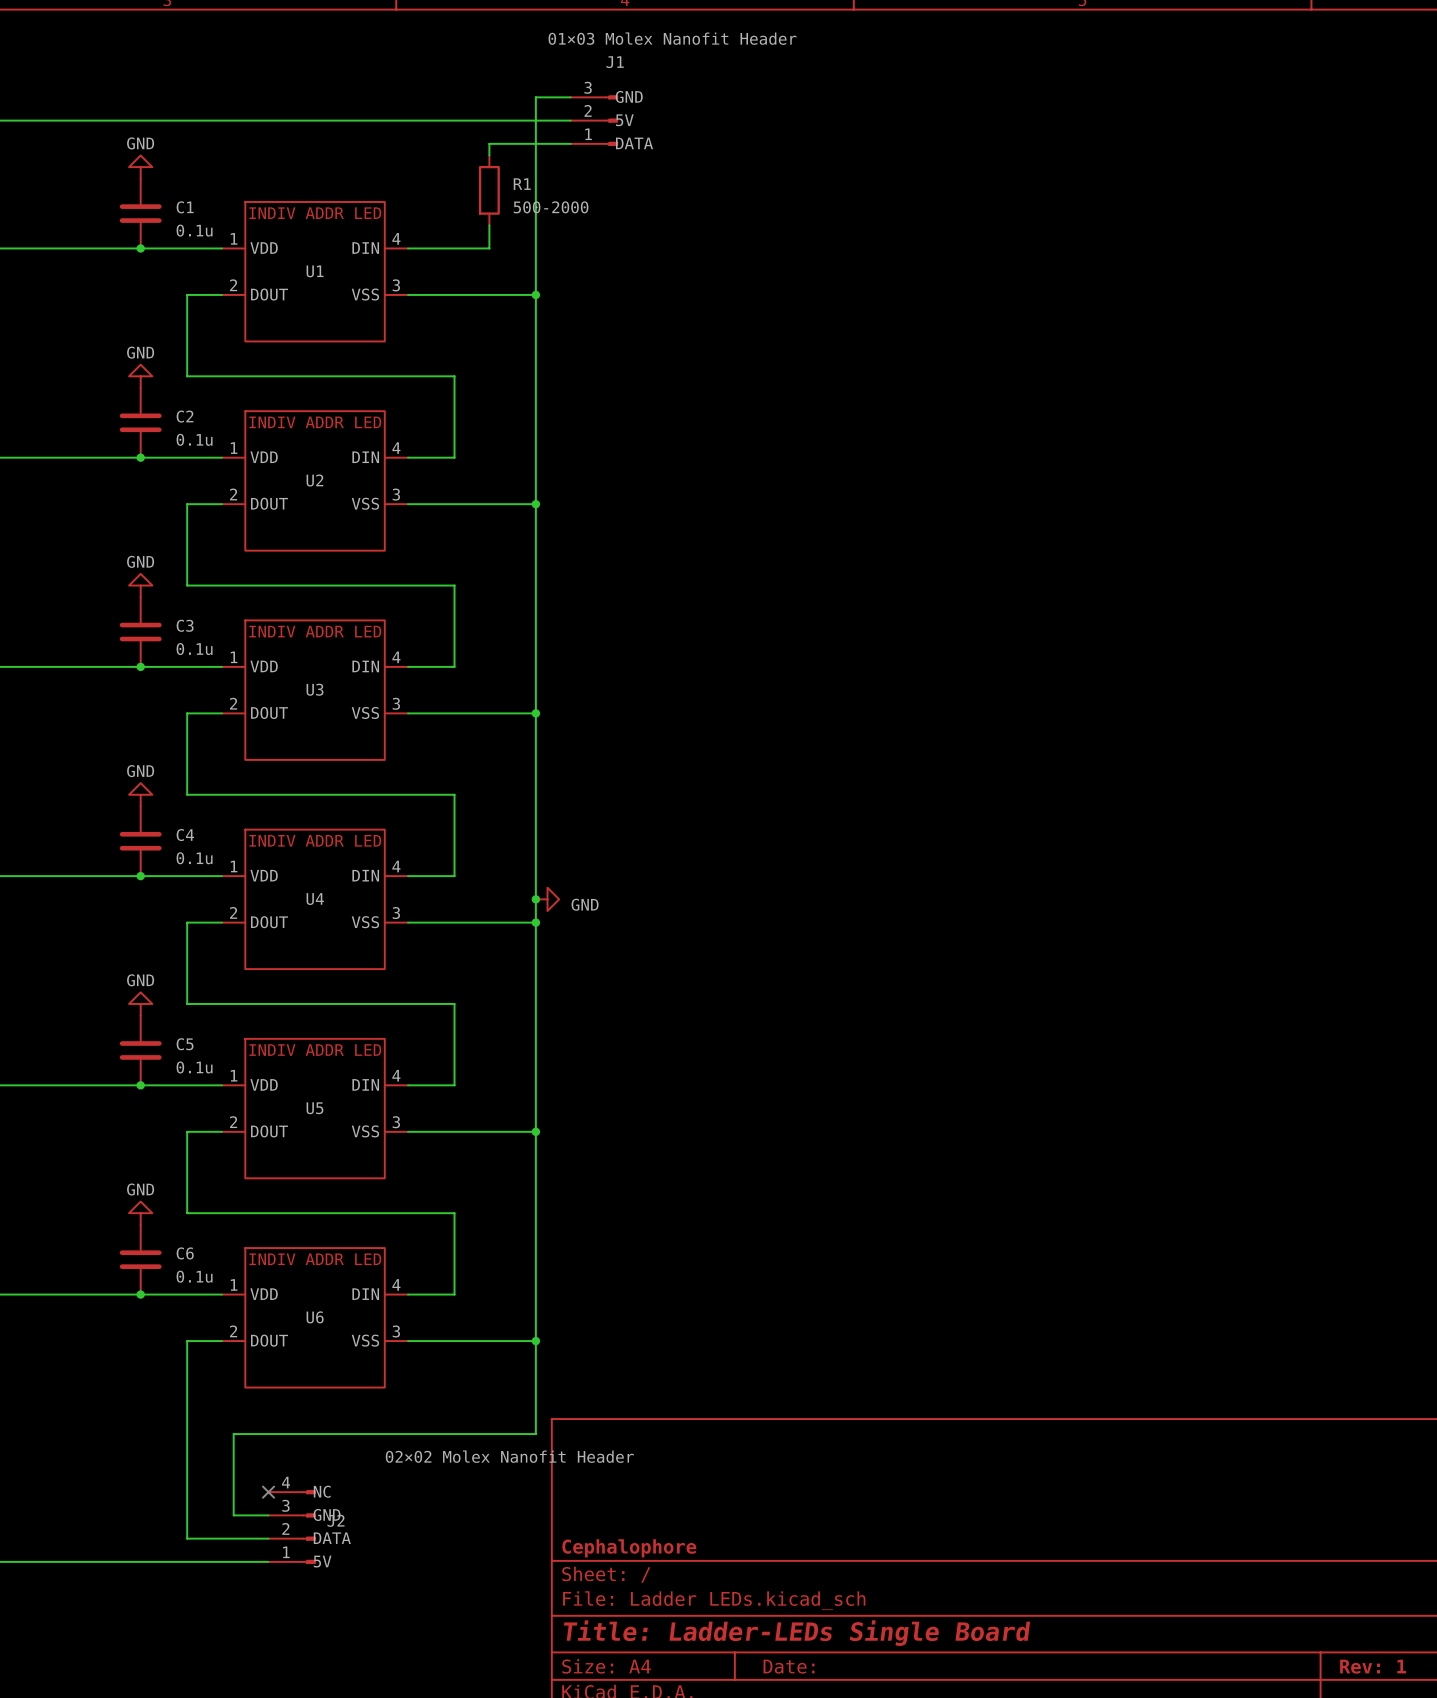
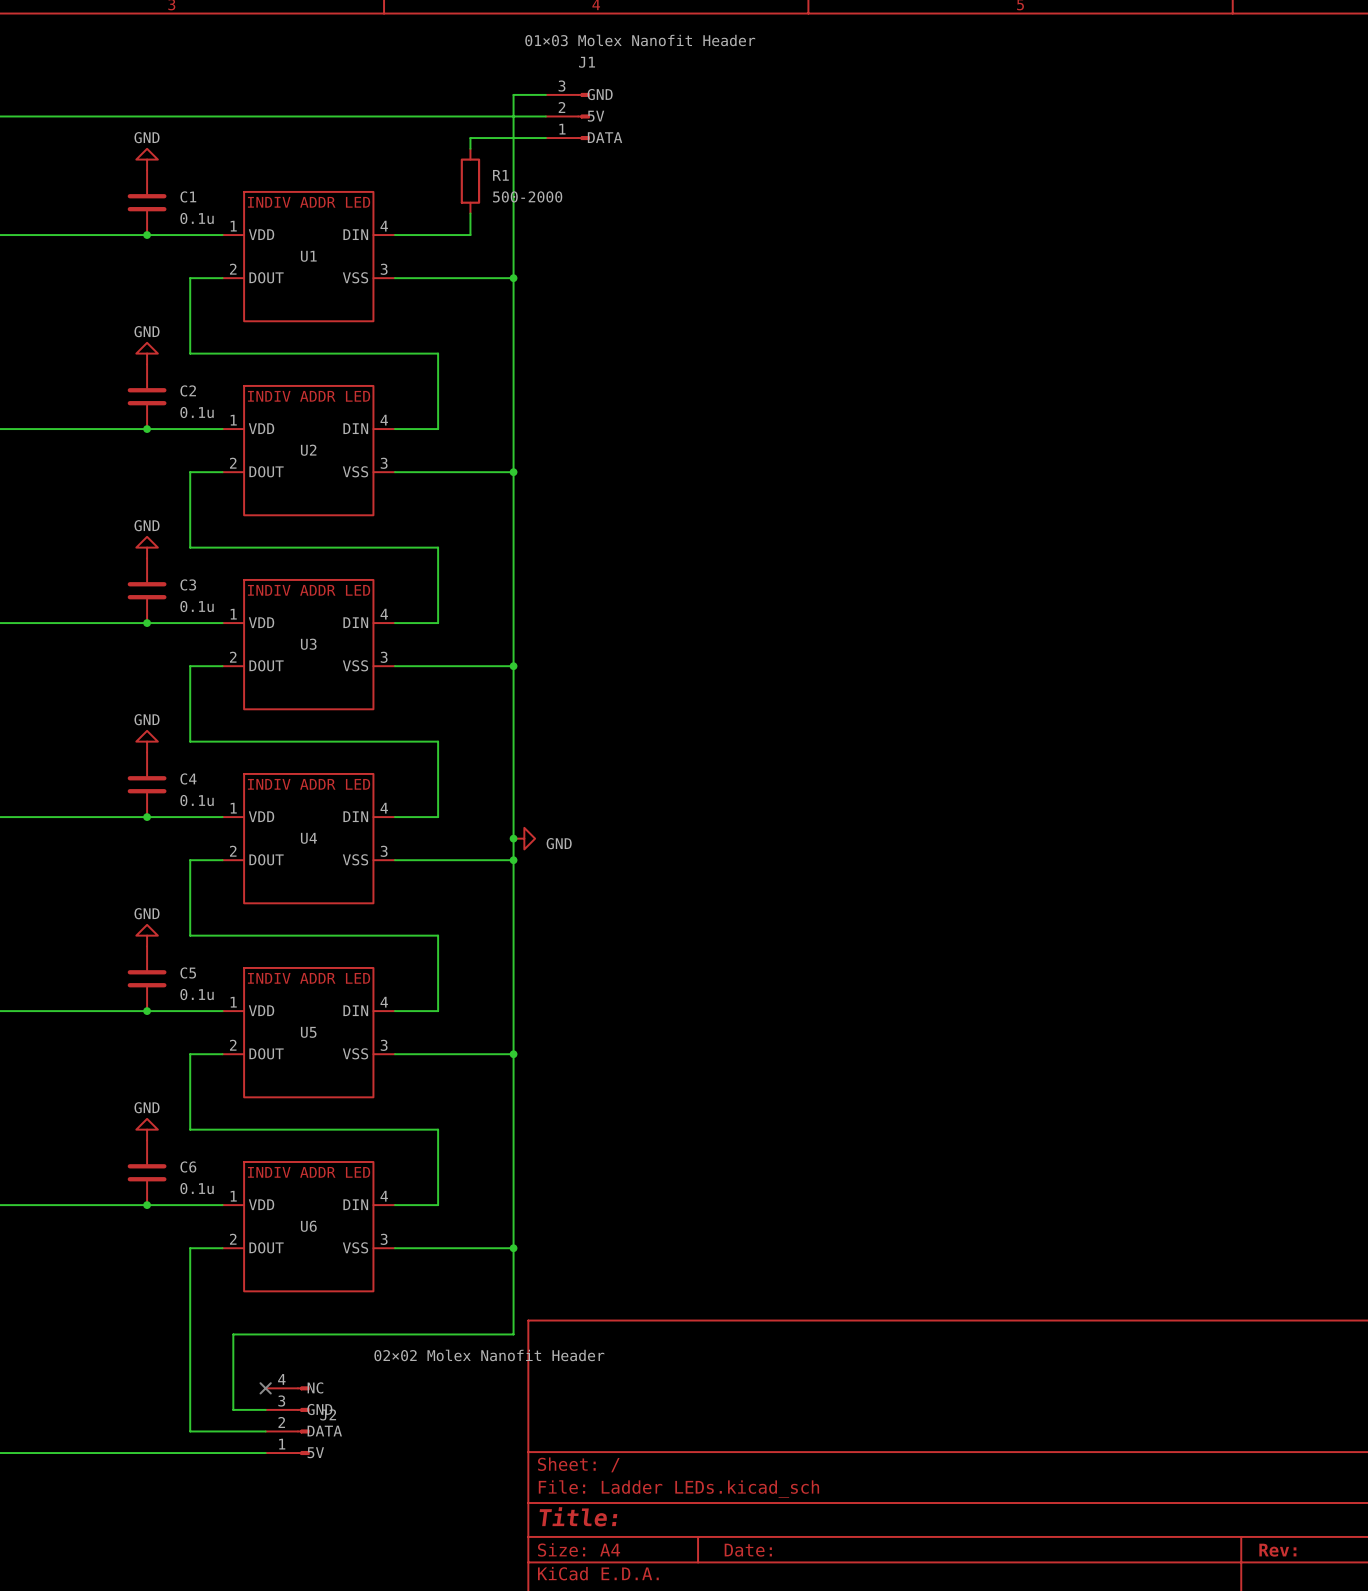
title block: Cephalophore (629, 1548) -> none
title block: Title: Ladder-LEDs Single Board (797, 1633) -> Title: (578, 1516)
title block: Rev: 1 (1373, 1666) -> Rev: (1277, 1550)

